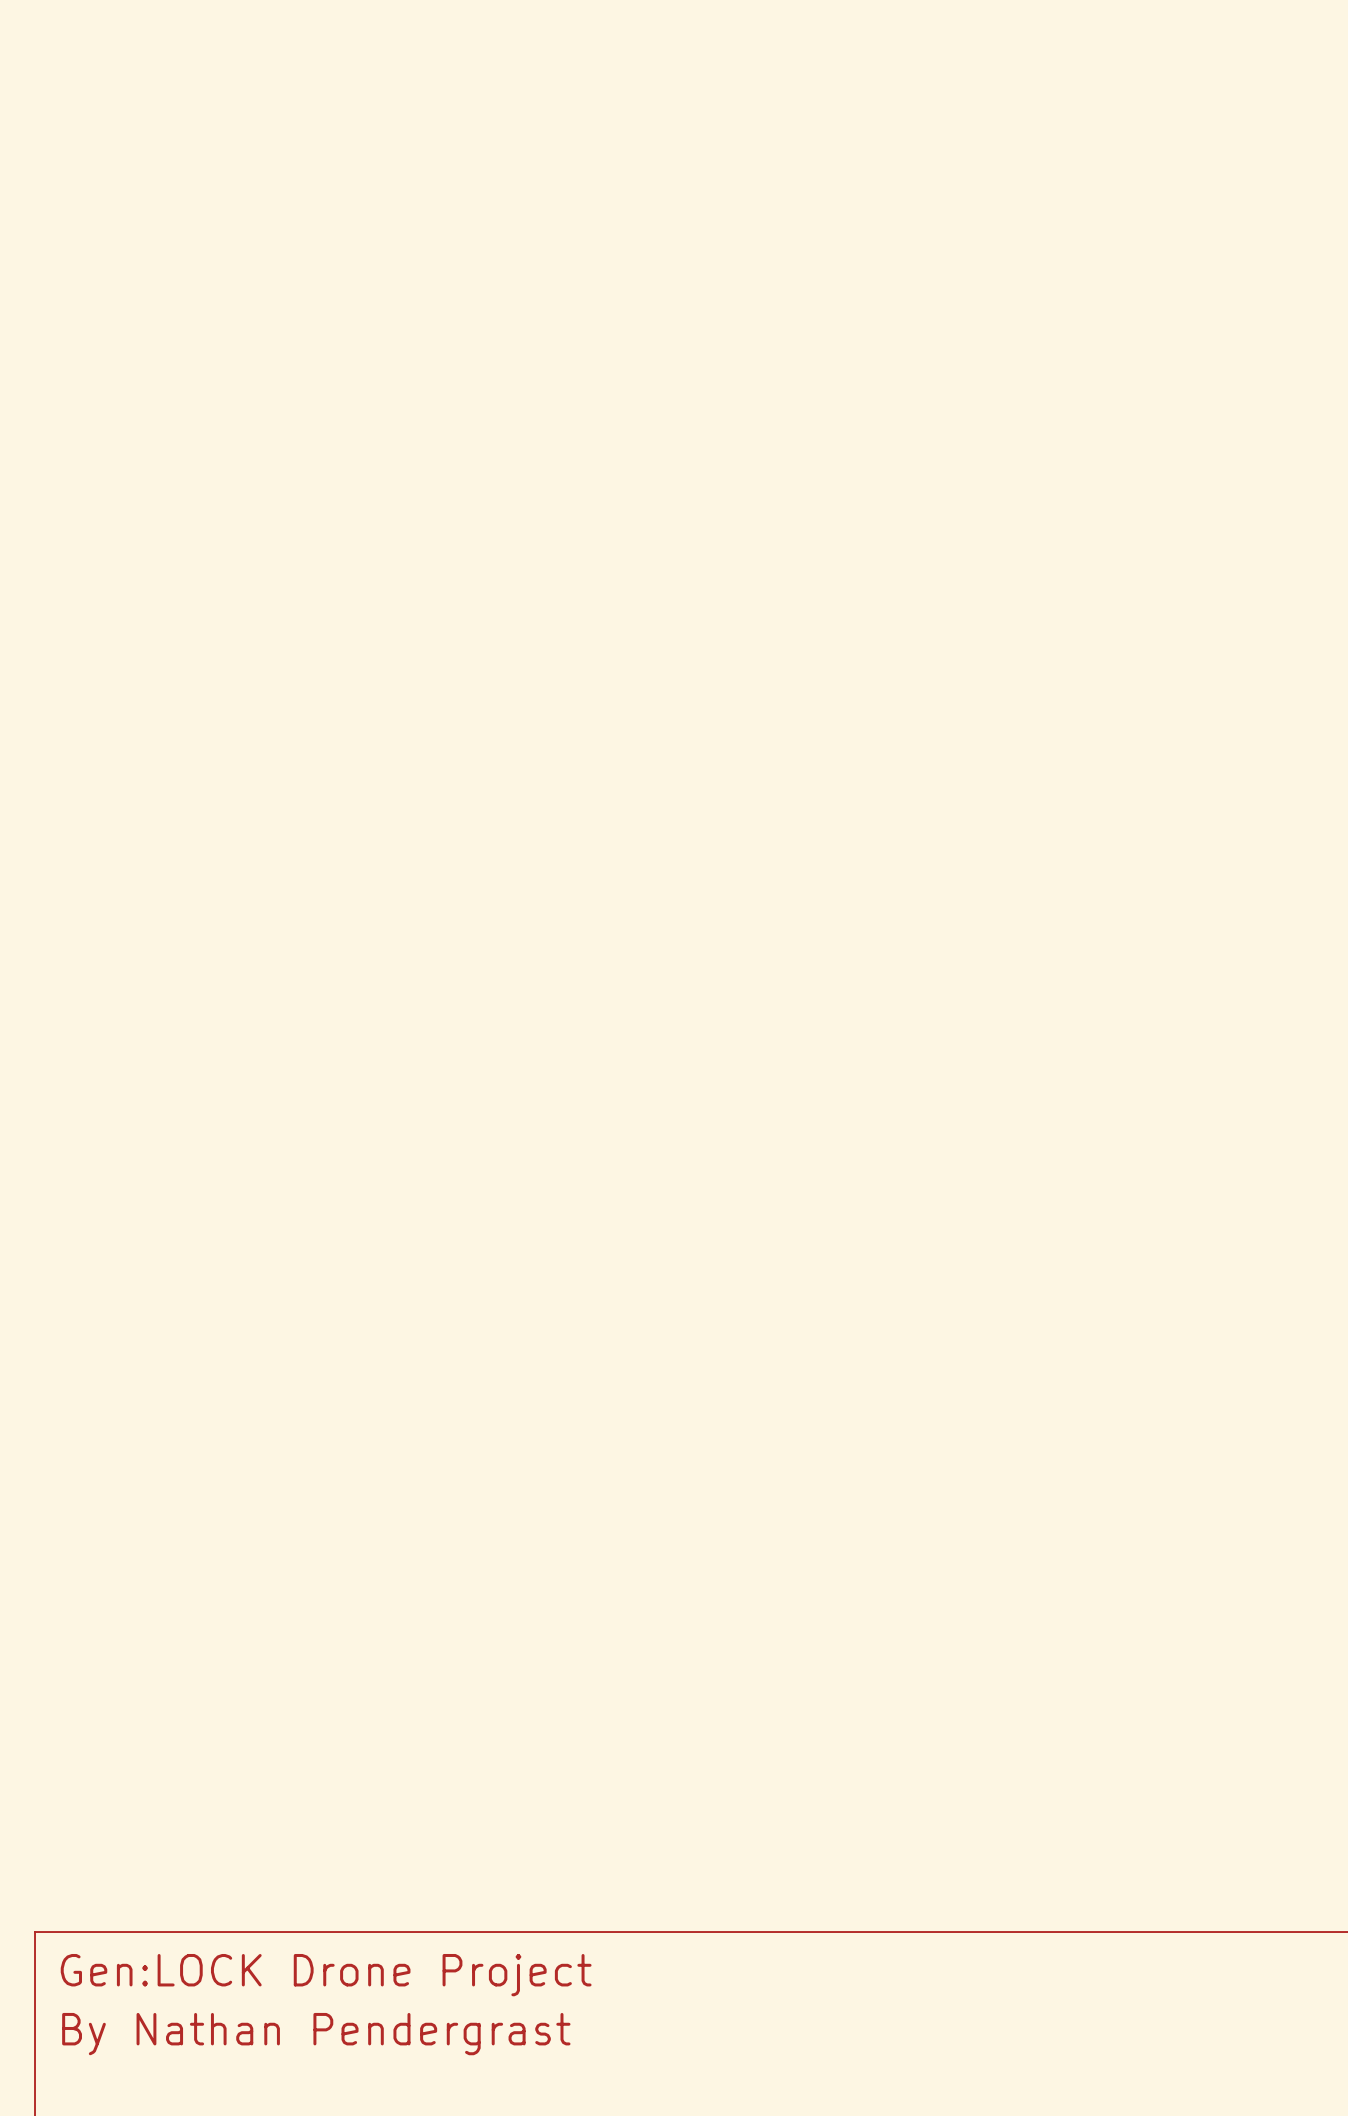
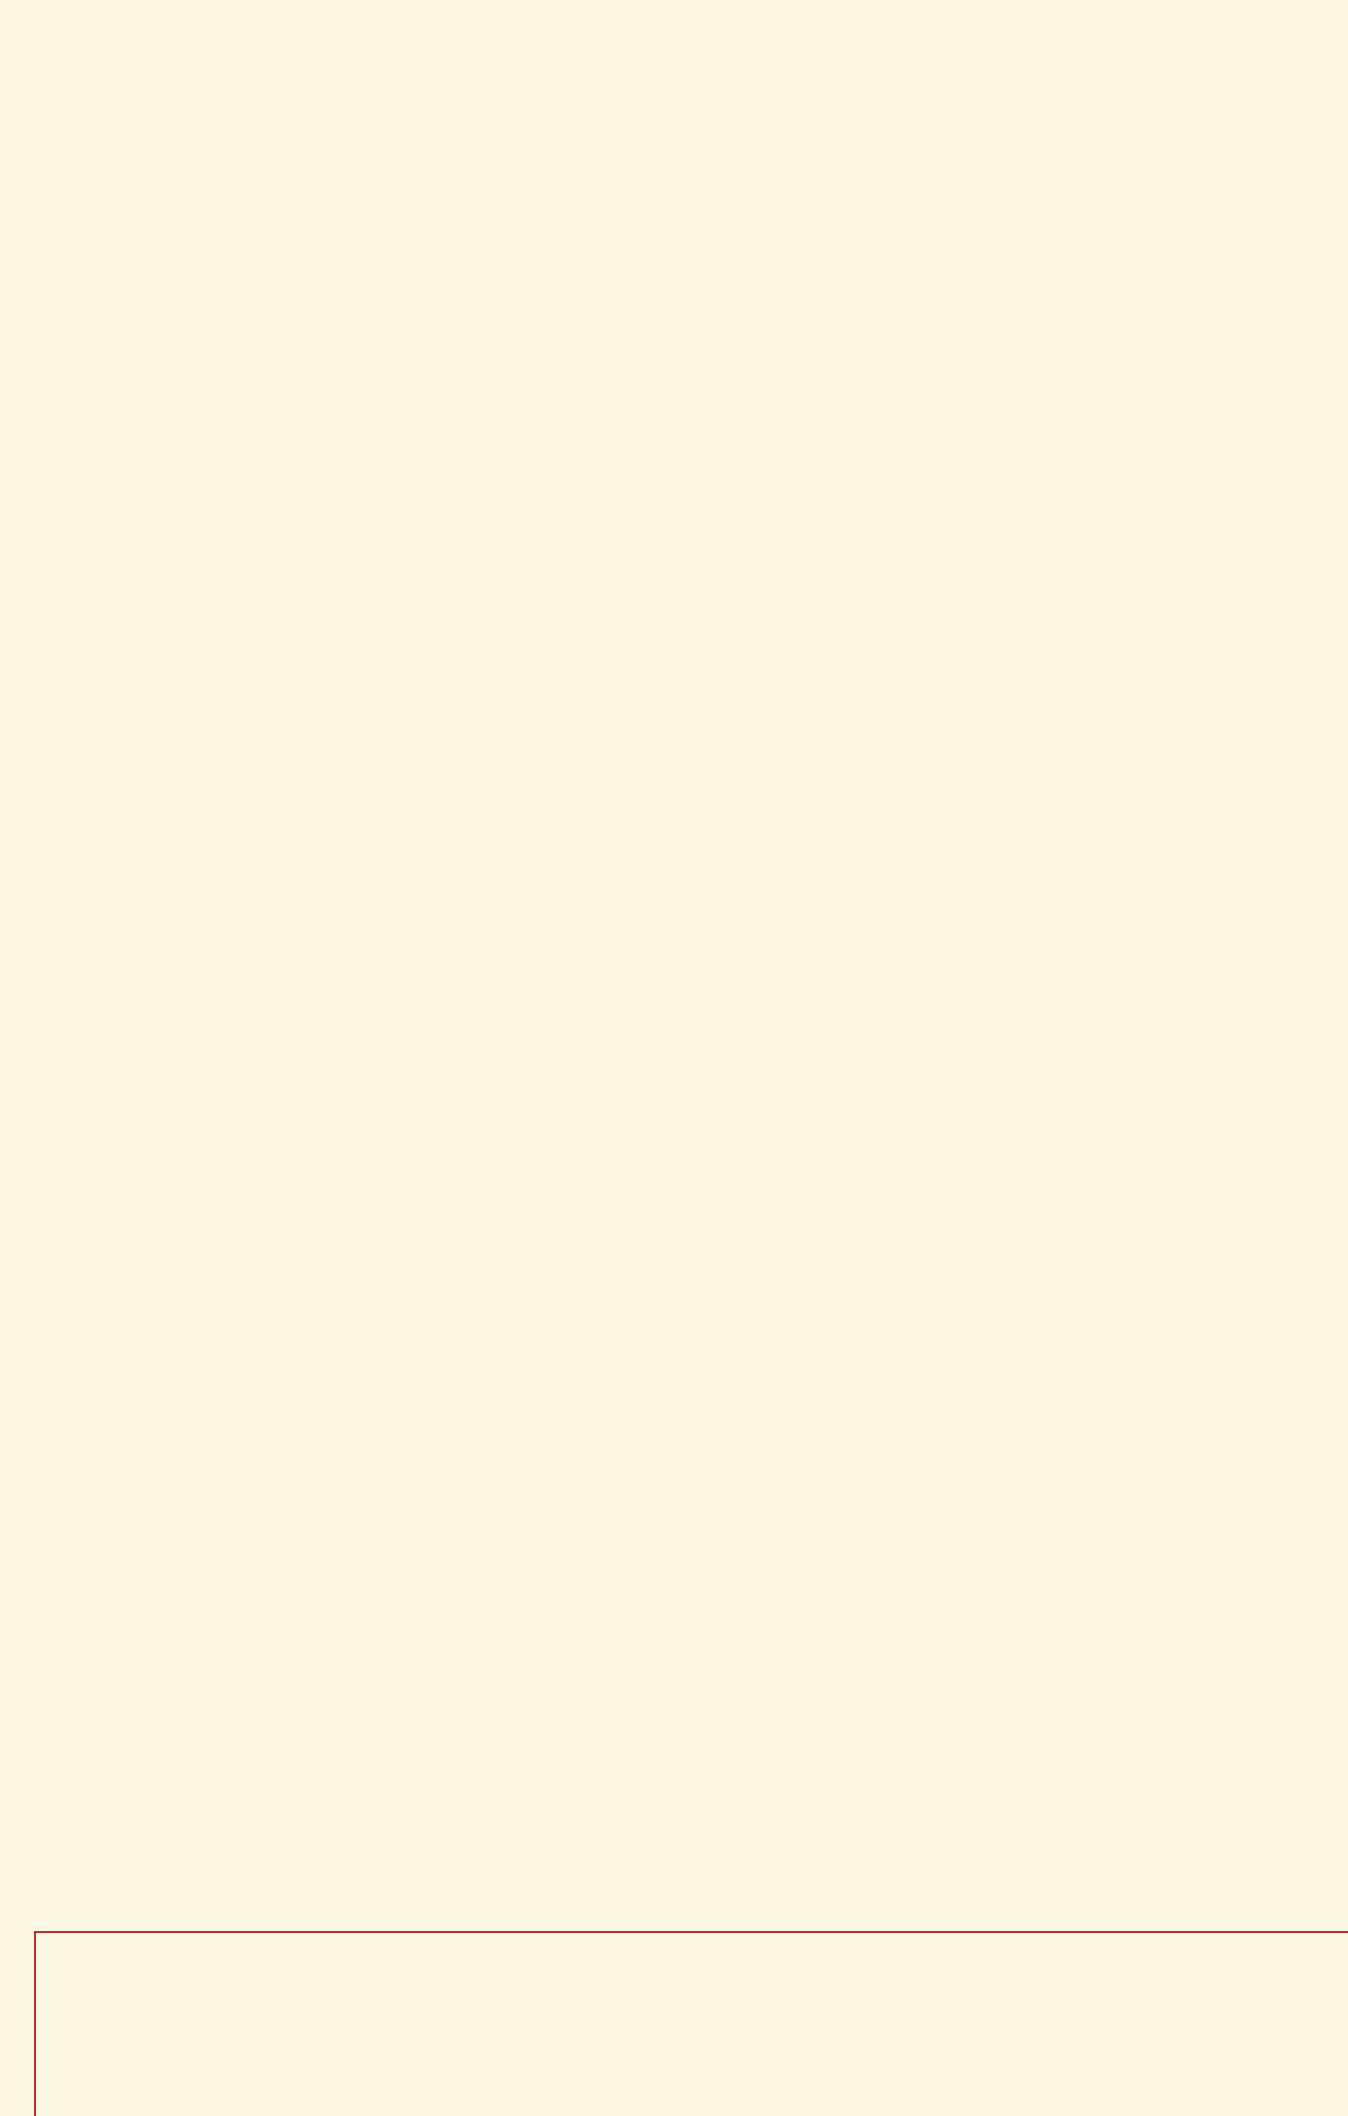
title block: Gen:LOCK Drone Project (326, 1975) -> none
title block: By Nathan Pendergrast (316, 2034) -> none

